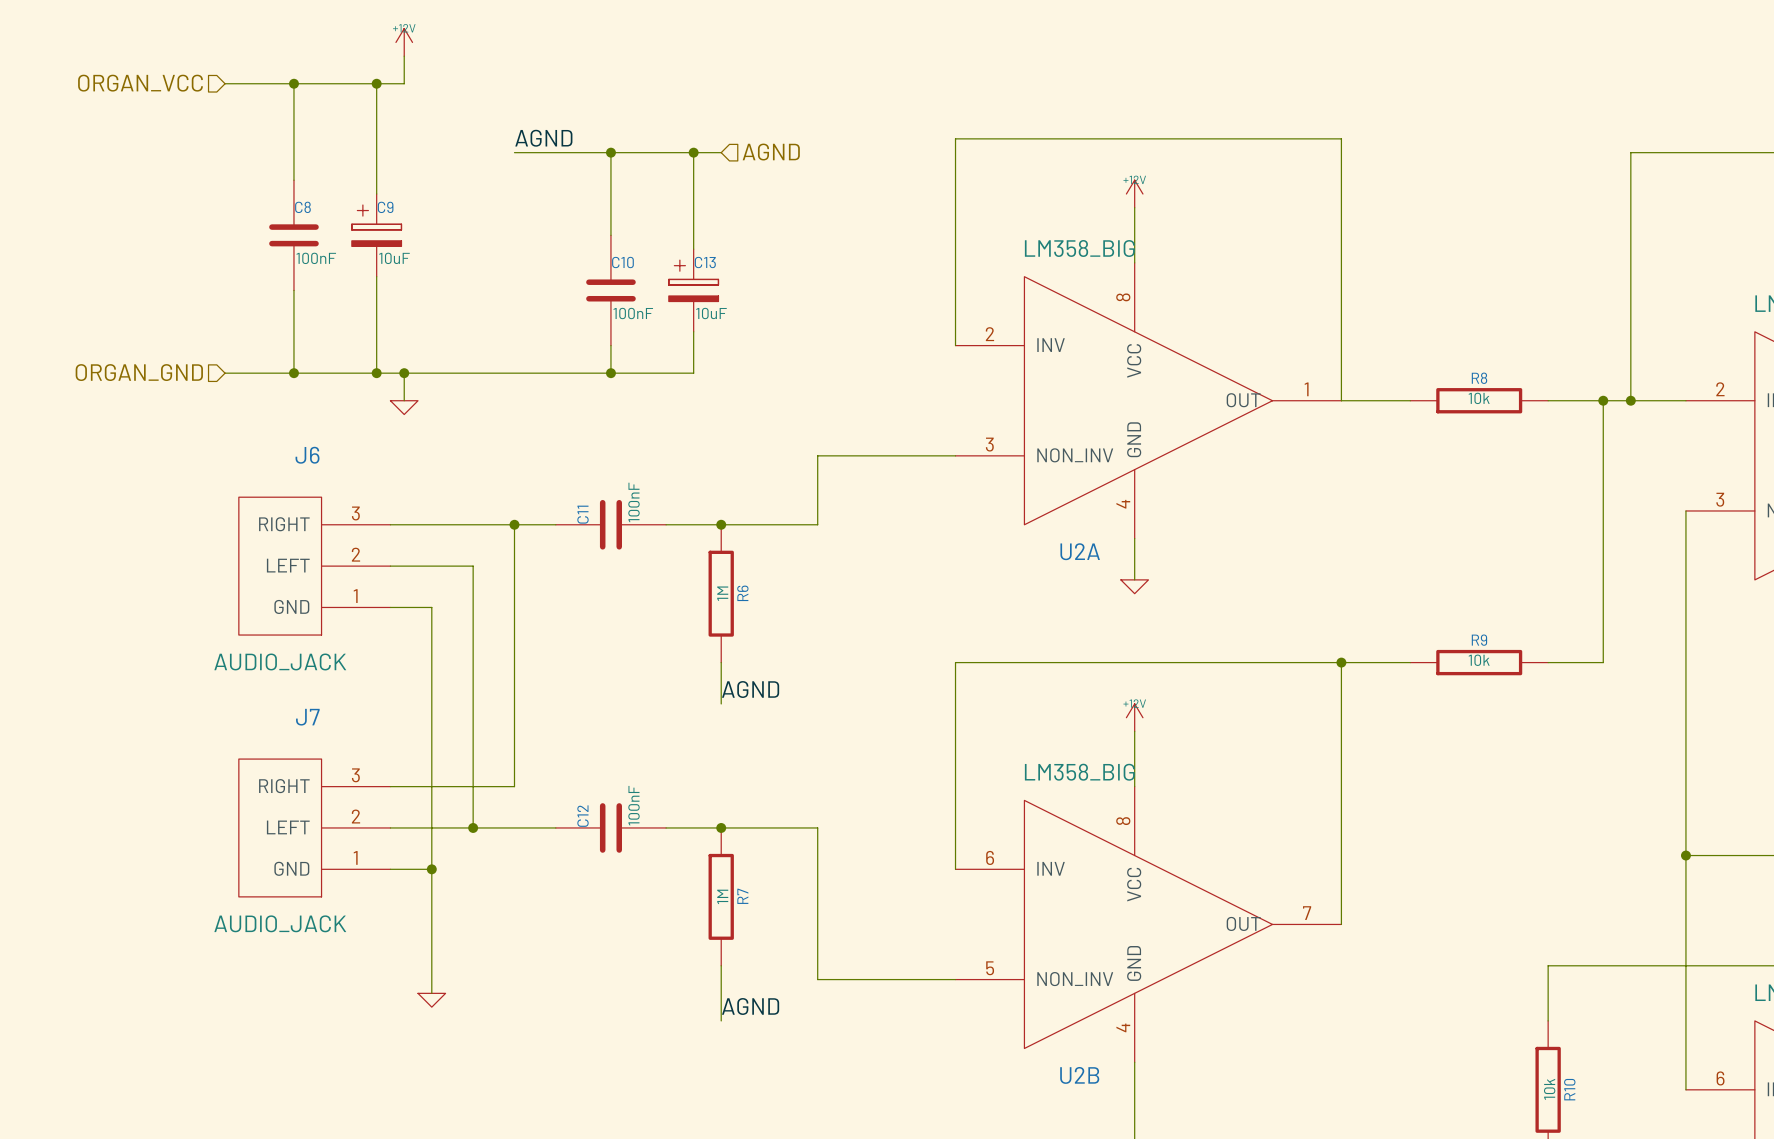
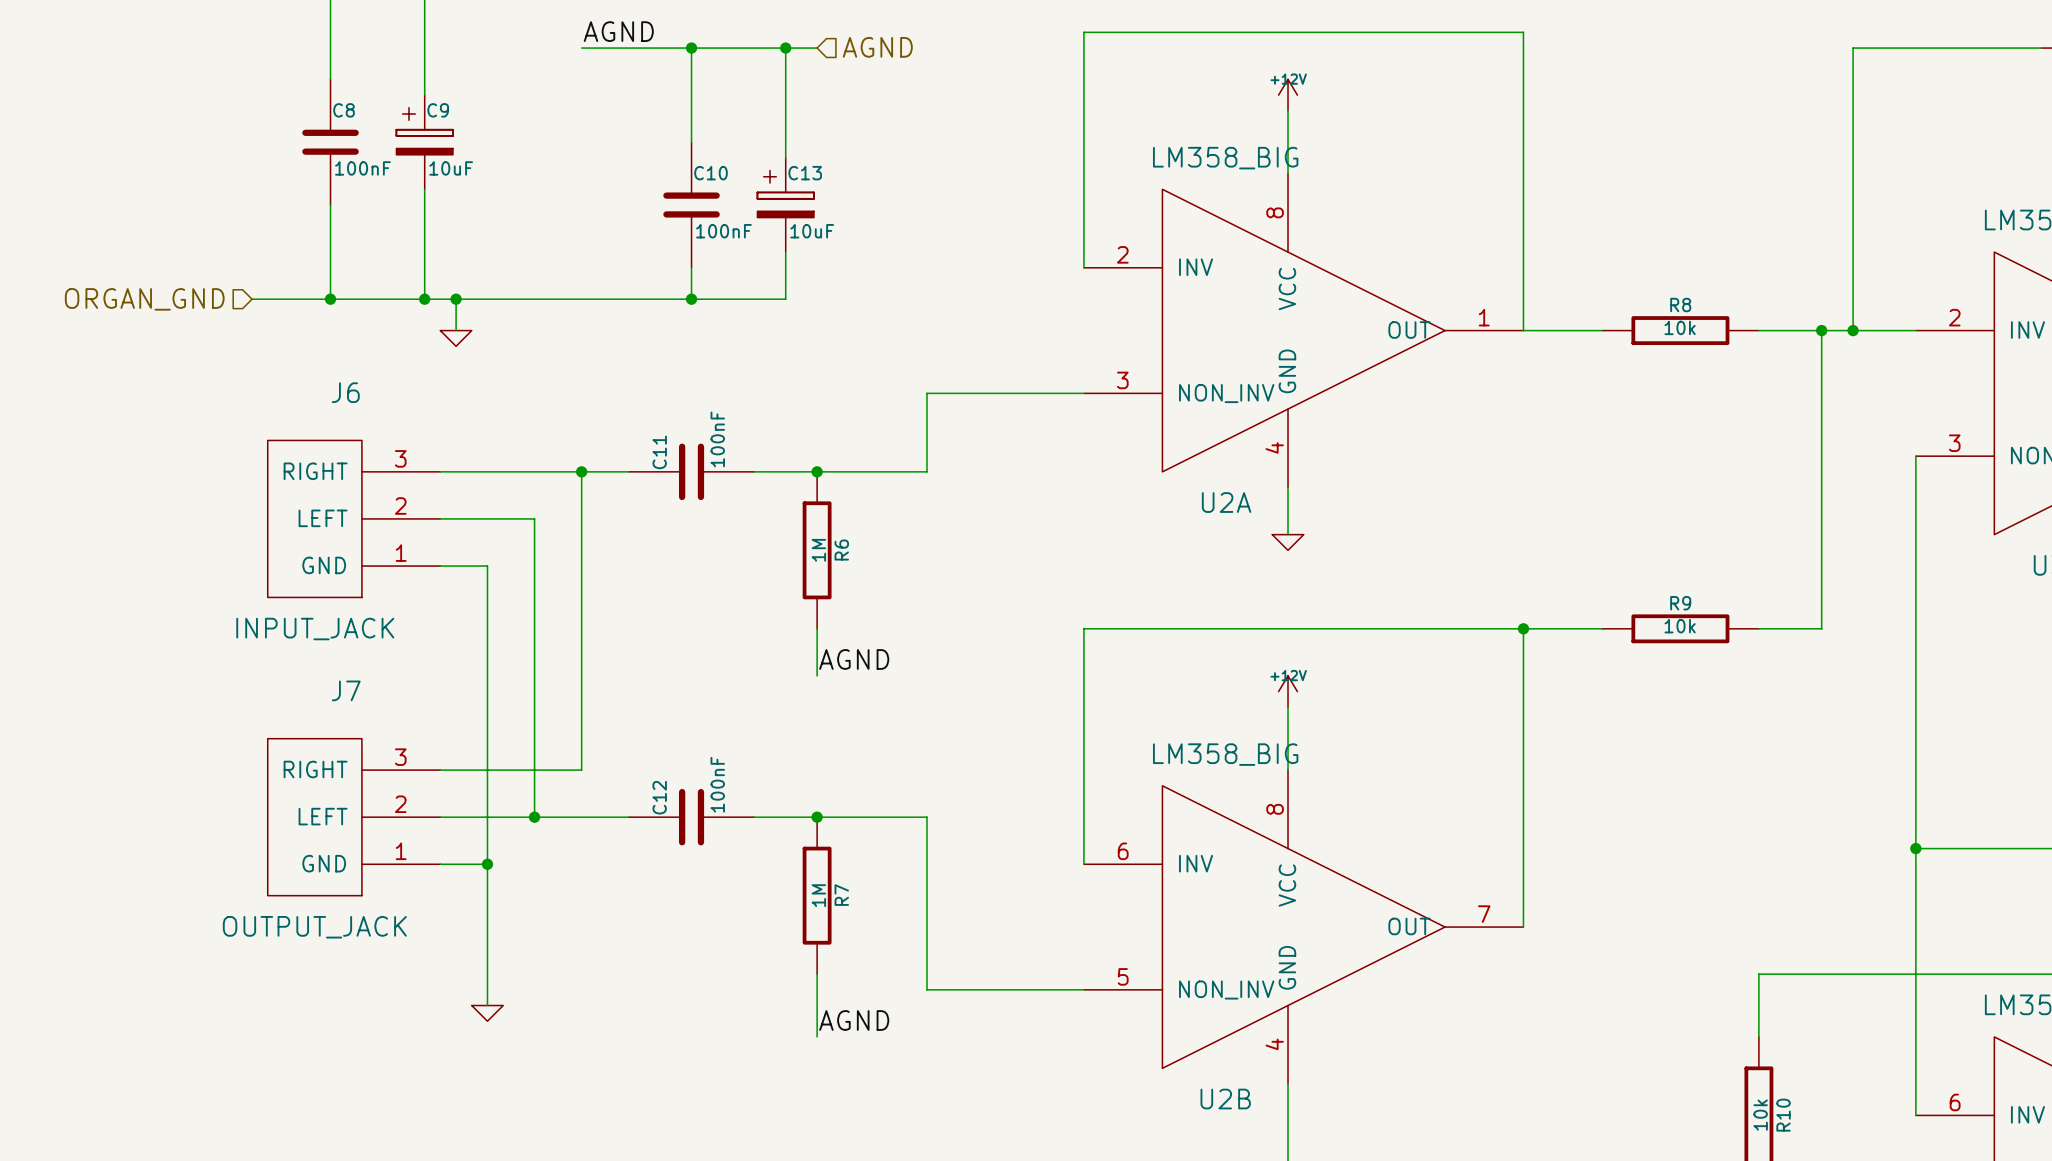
J6 value: AUDIO_JACK (280, 661) -> INPUT_JACK (315, 629)
J7 value: AUDIO_JACK (280, 923) -> OUTPUT_JACK (314, 927)

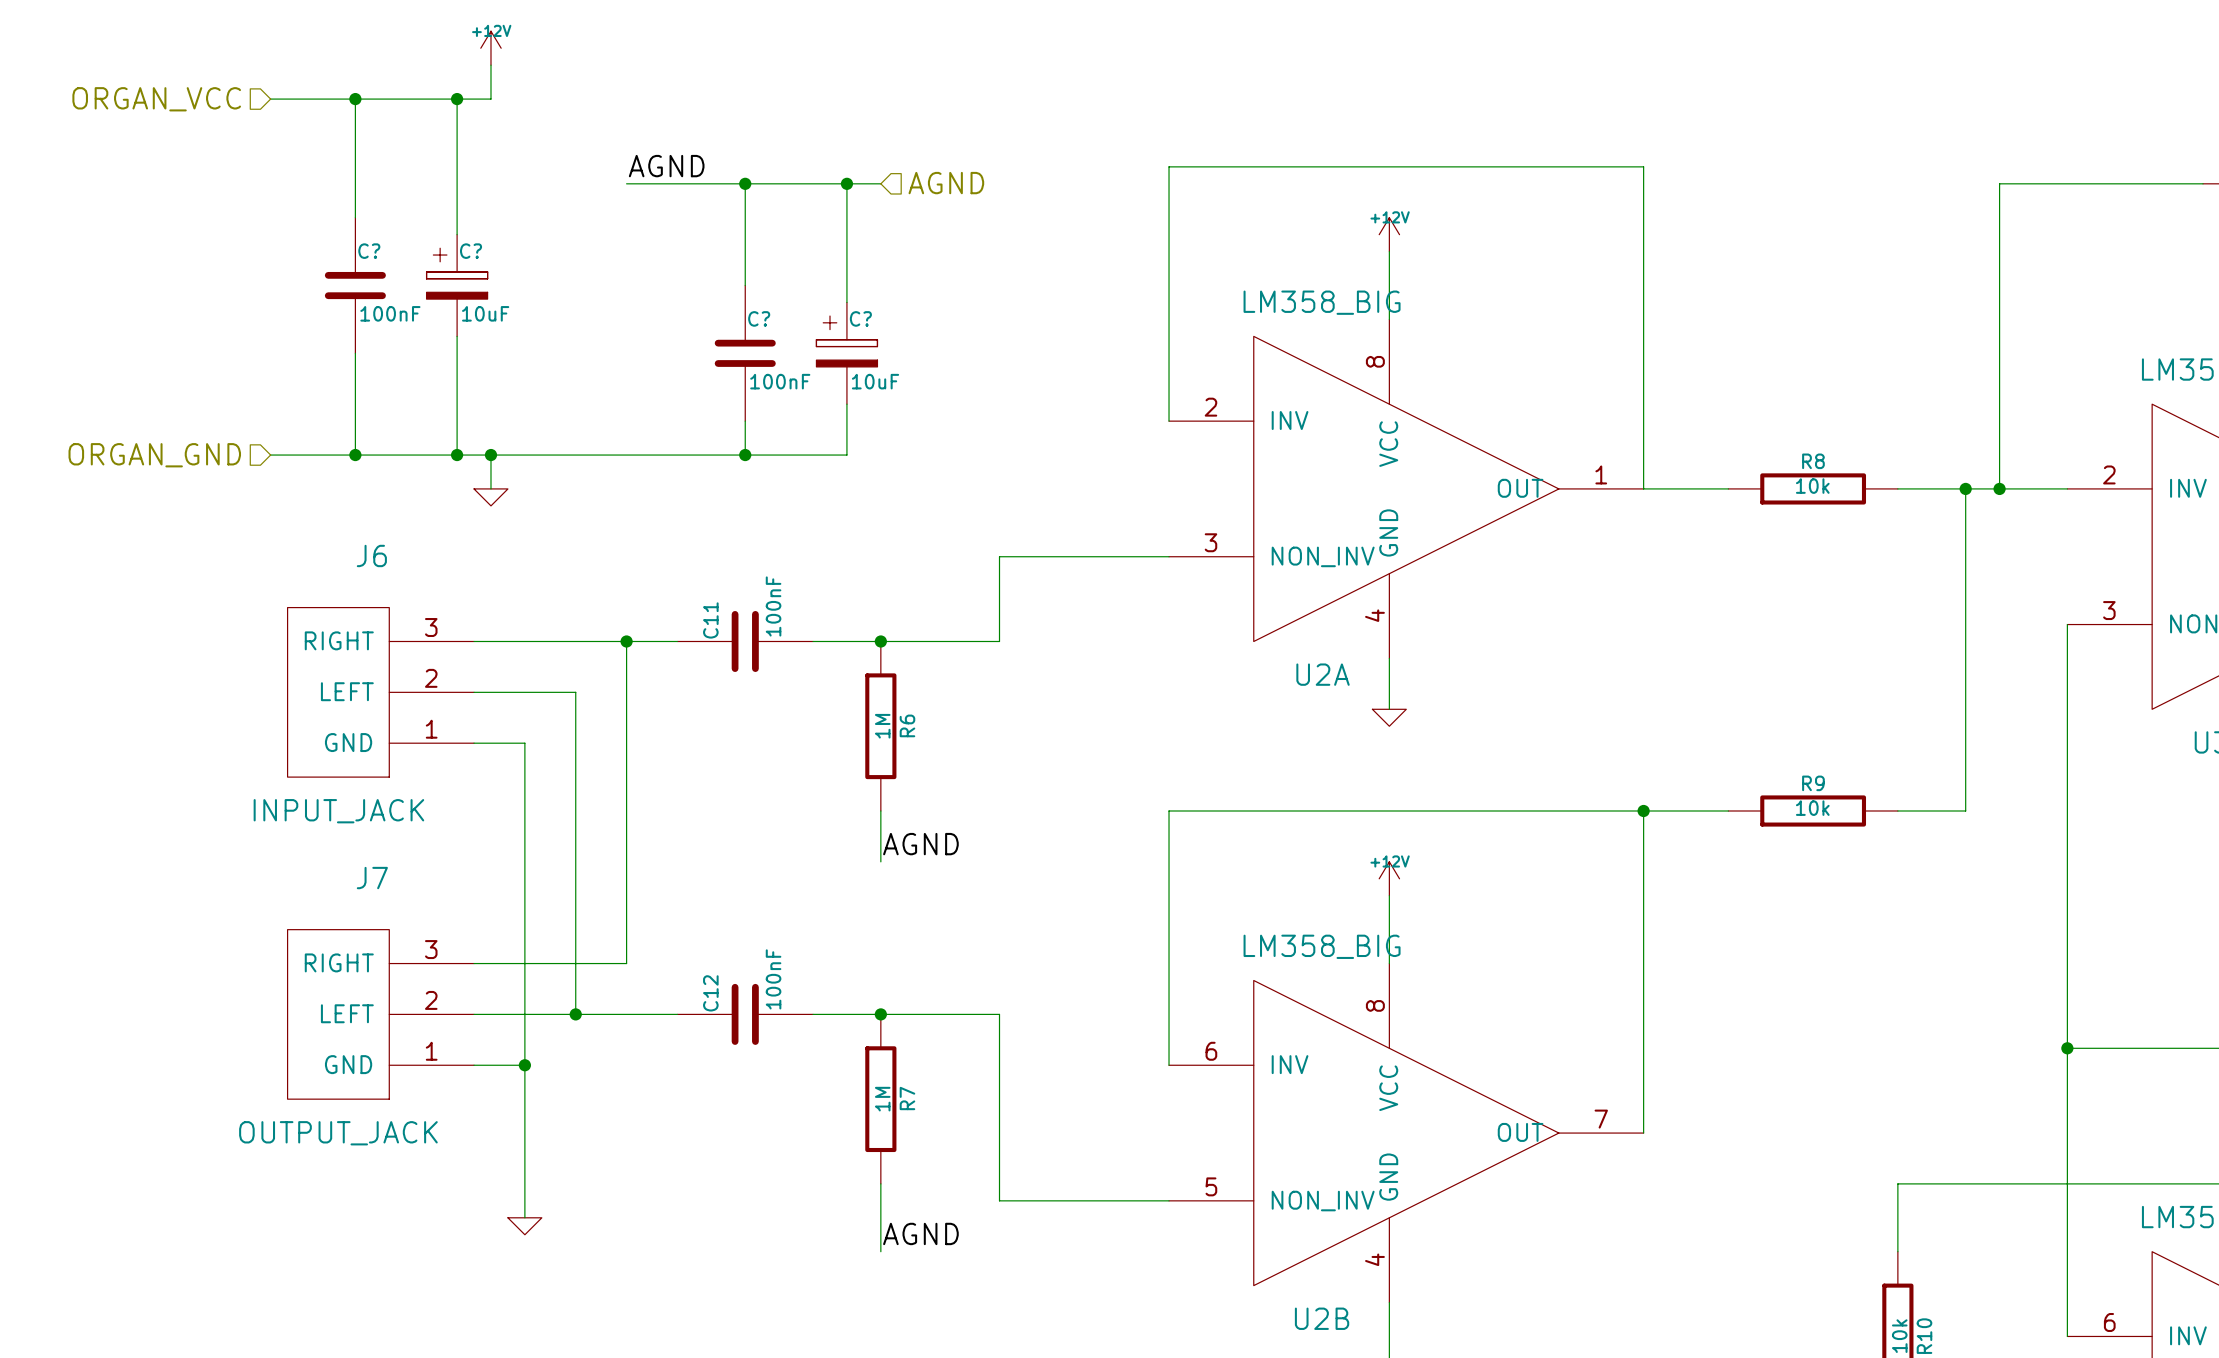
C8 name: C8 (344, 110) -> C? (369, 251)
C9 name: C9 (438, 110) -> C? (471, 251)
C10 name: C10 (711, 173) -> C? (759, 318)
C13 name: C13 (805, 173) -> C? (860, 318)

